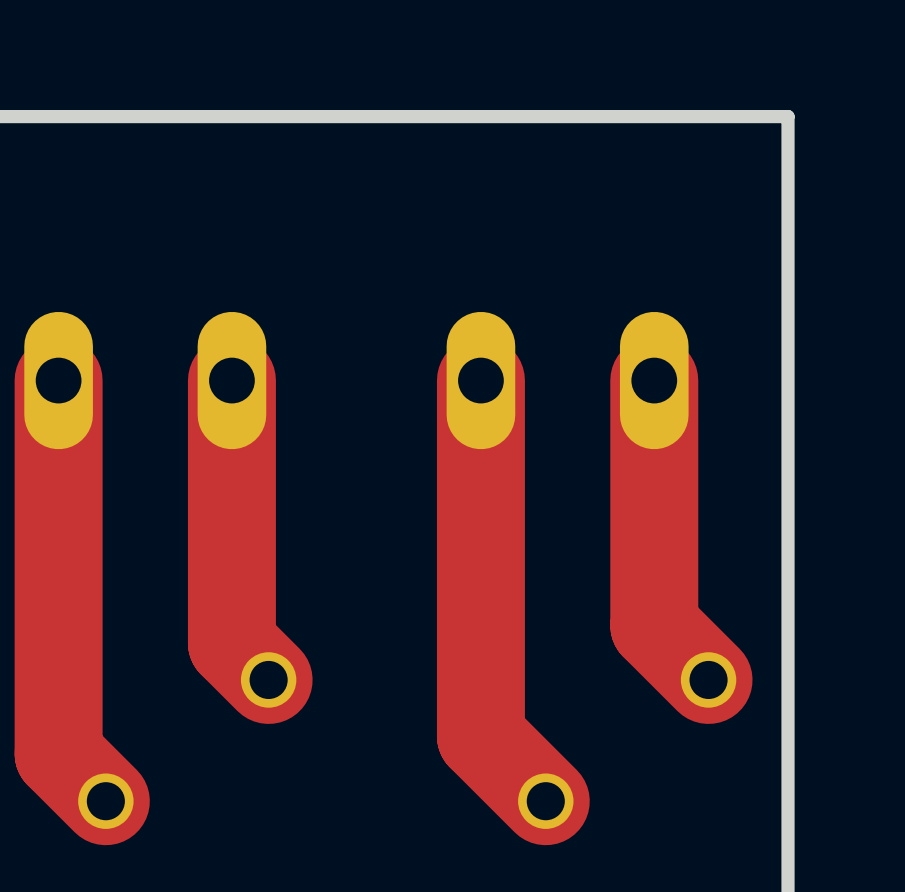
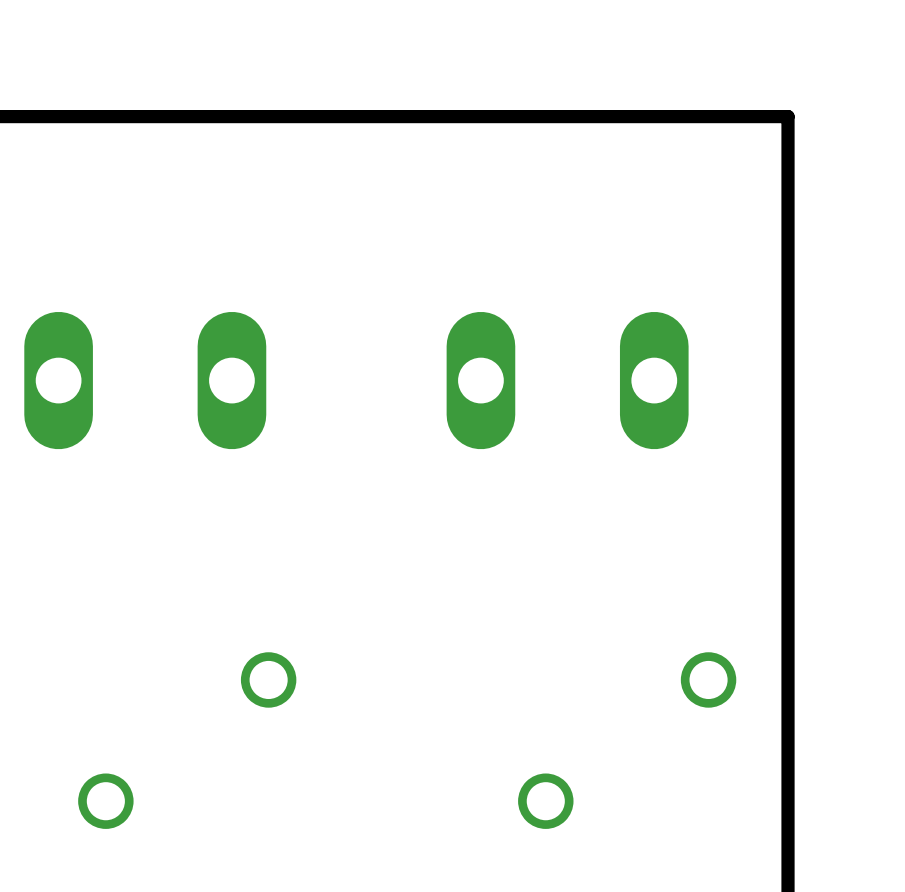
top track: (58, 380) (58, 753) (105, 801) -> none
top track: (231, 380) (231, 643) (268, 679) -> none
top track: (480, 380) (480, 736) (545, 801) -> none
top track: (654, 380) (654, 625) (708, 679) -> none

